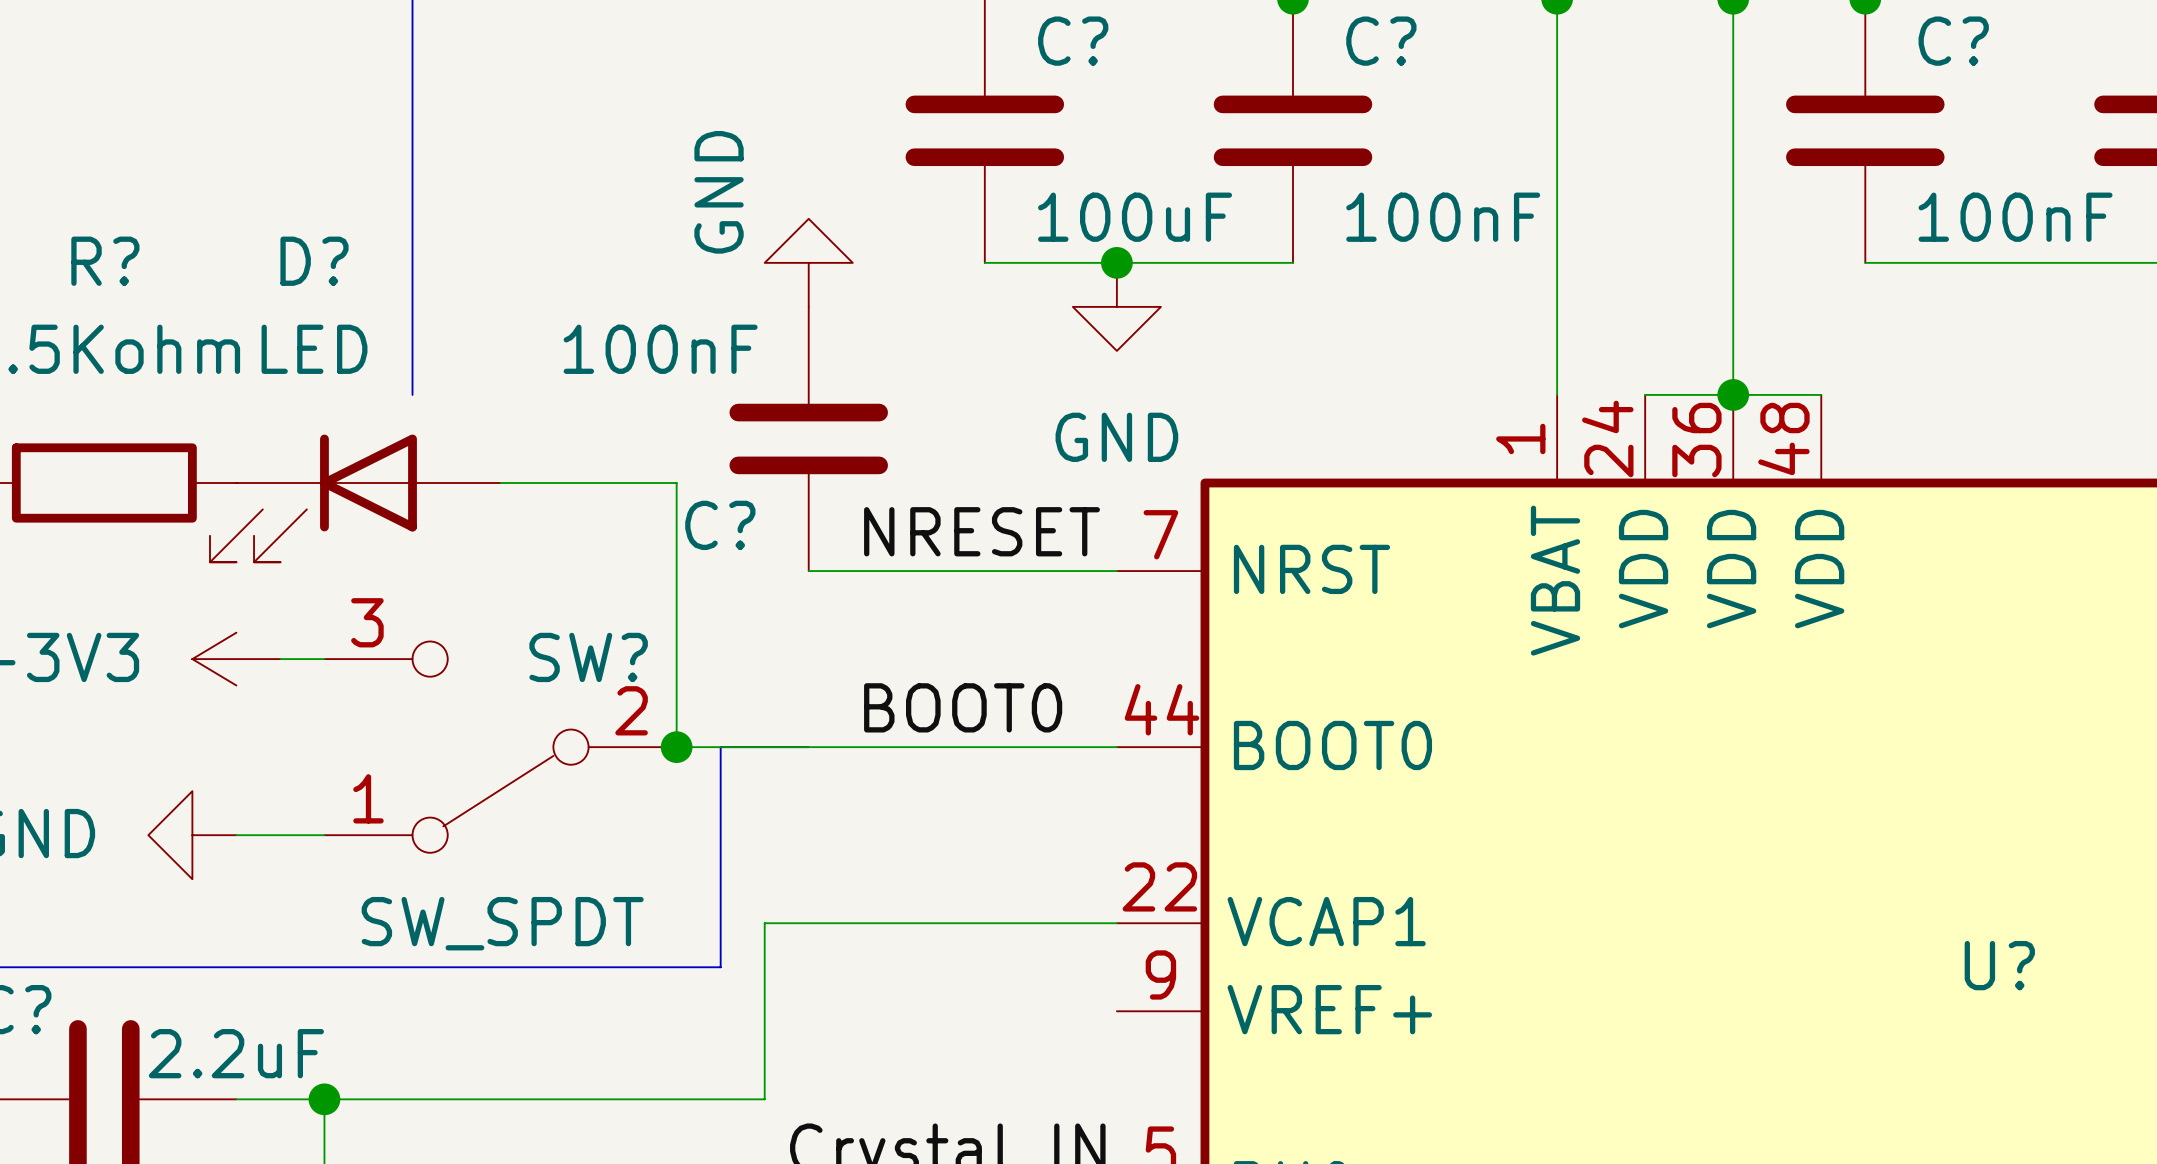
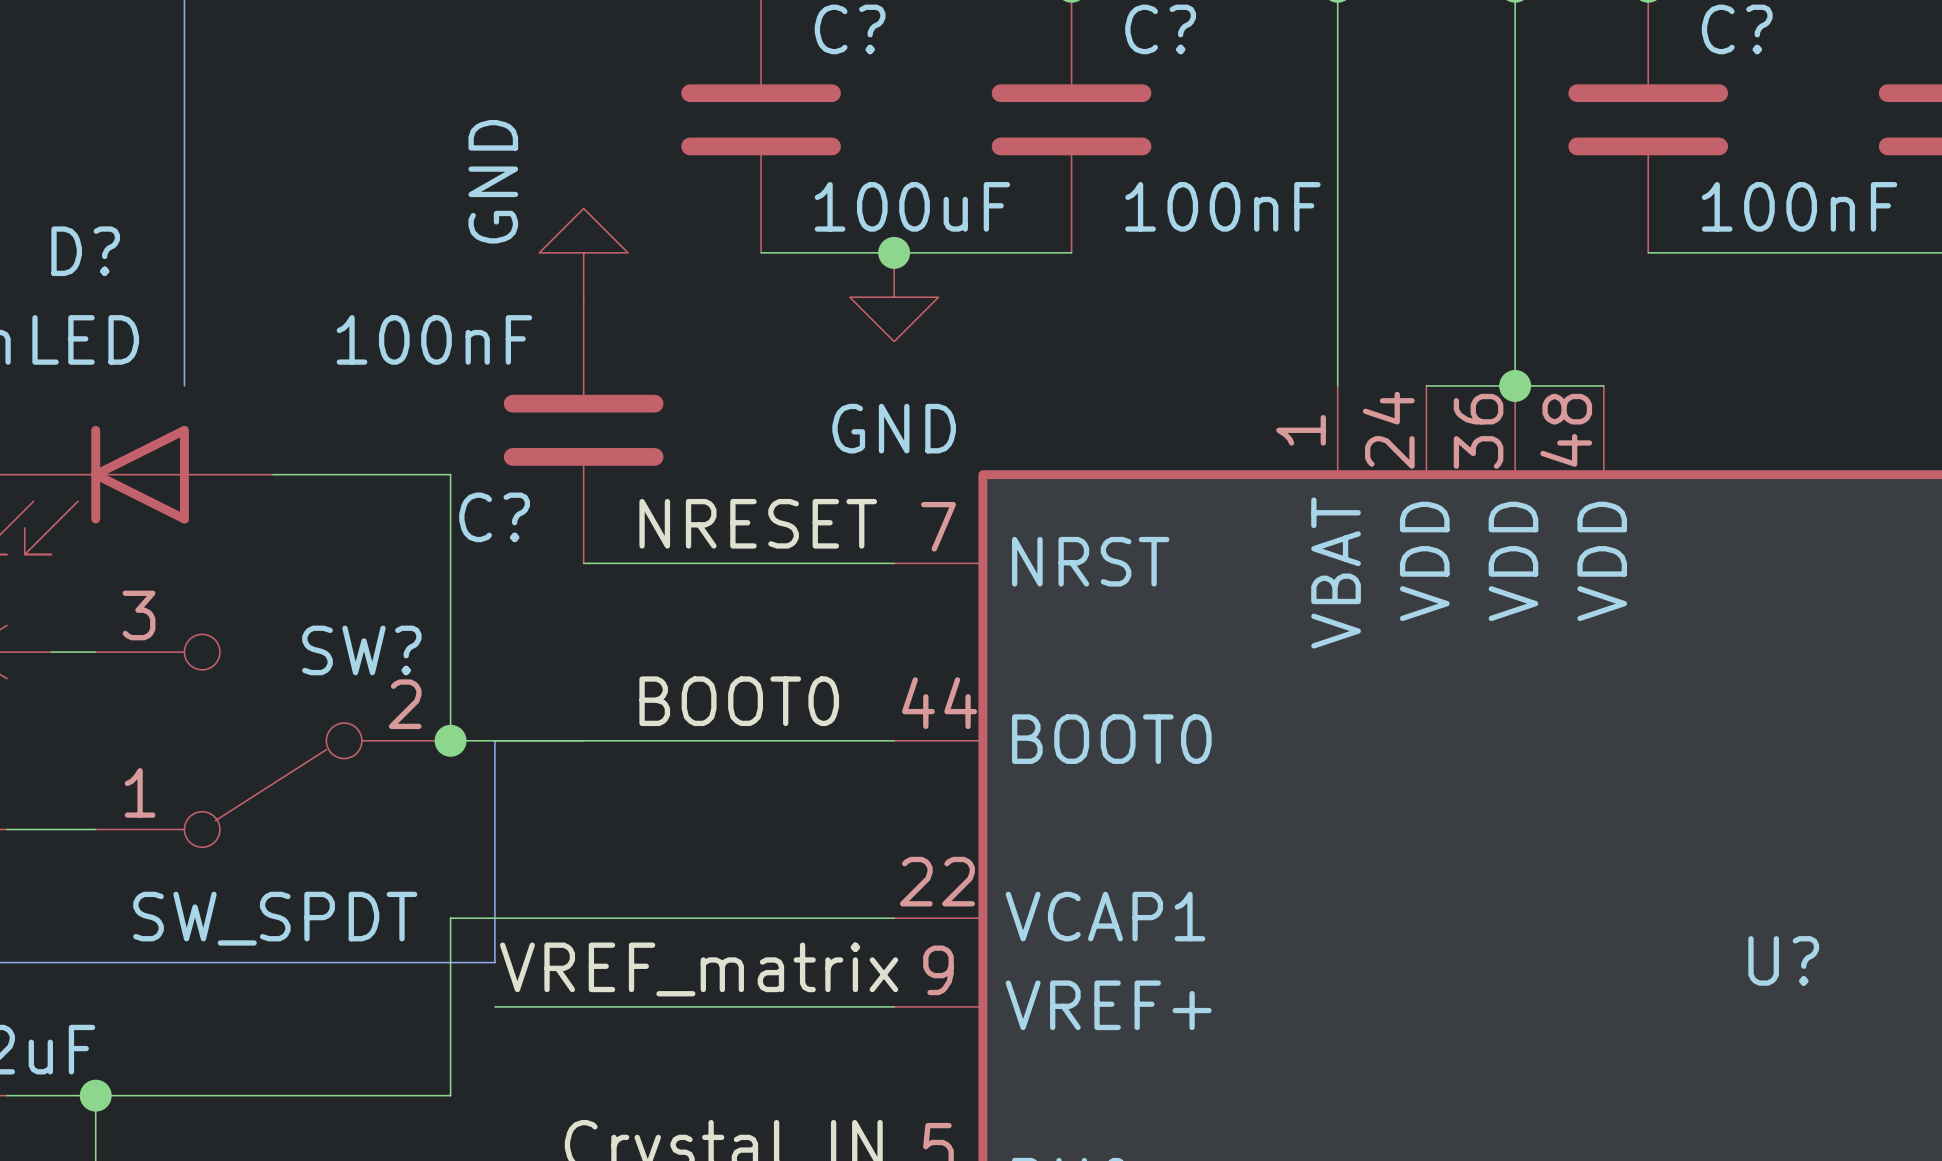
wire: (764, 923) (764, 1099) (676, 1099) -> (539, 918) (450, 918) (450, 1095)
label: none -> VREF_matrix (699, 969)
wire: none -> (494, 1006) (894, 1006)

